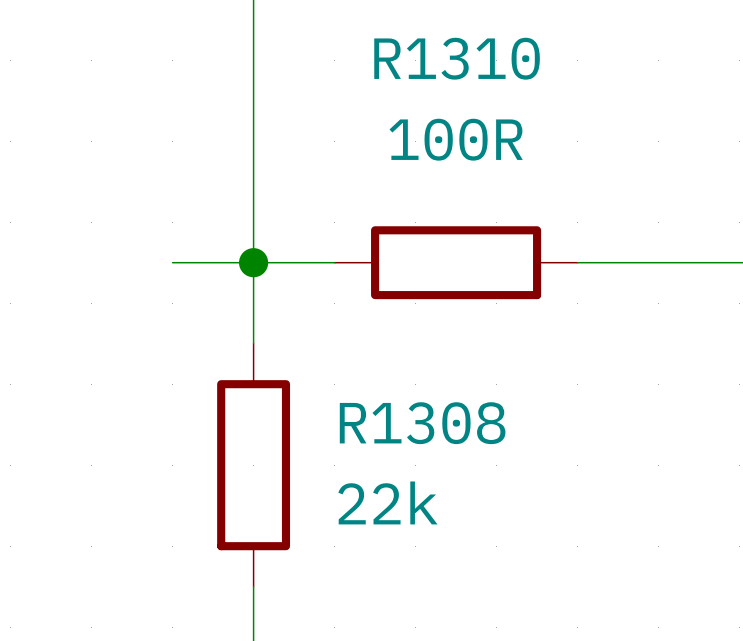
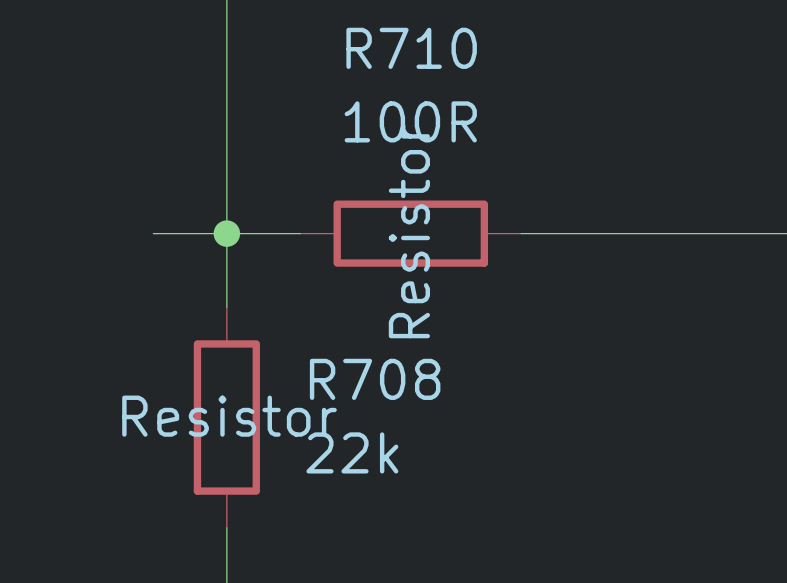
R1310 name: R1310 (457, 58) -> R710 (411, 48)
R1310 text: none -> Resistor (409, 230)
R1308 name: R1308 (422, 423) -> R708 (375, 379)
R1308 text: none -> Resistor (229, 416)

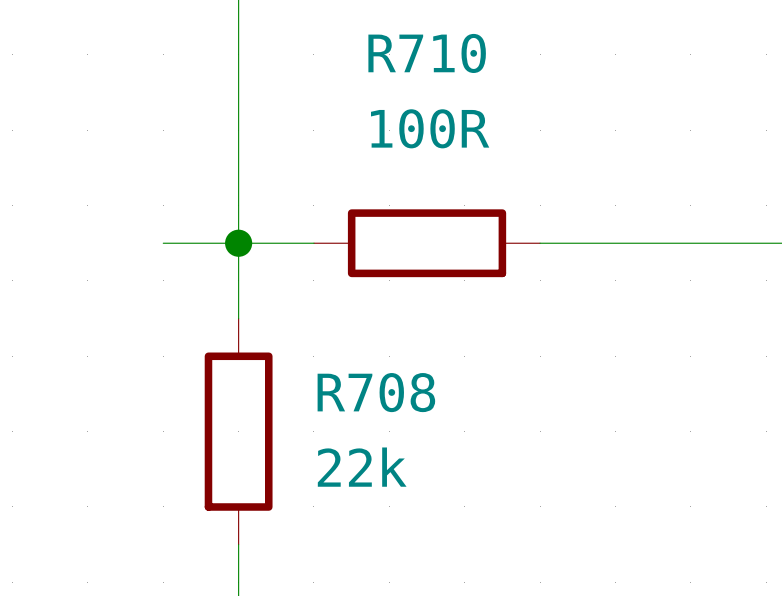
R710 text: Resistor (409, 230) -> none
R708 text: Resistor (229, 416) -> none

